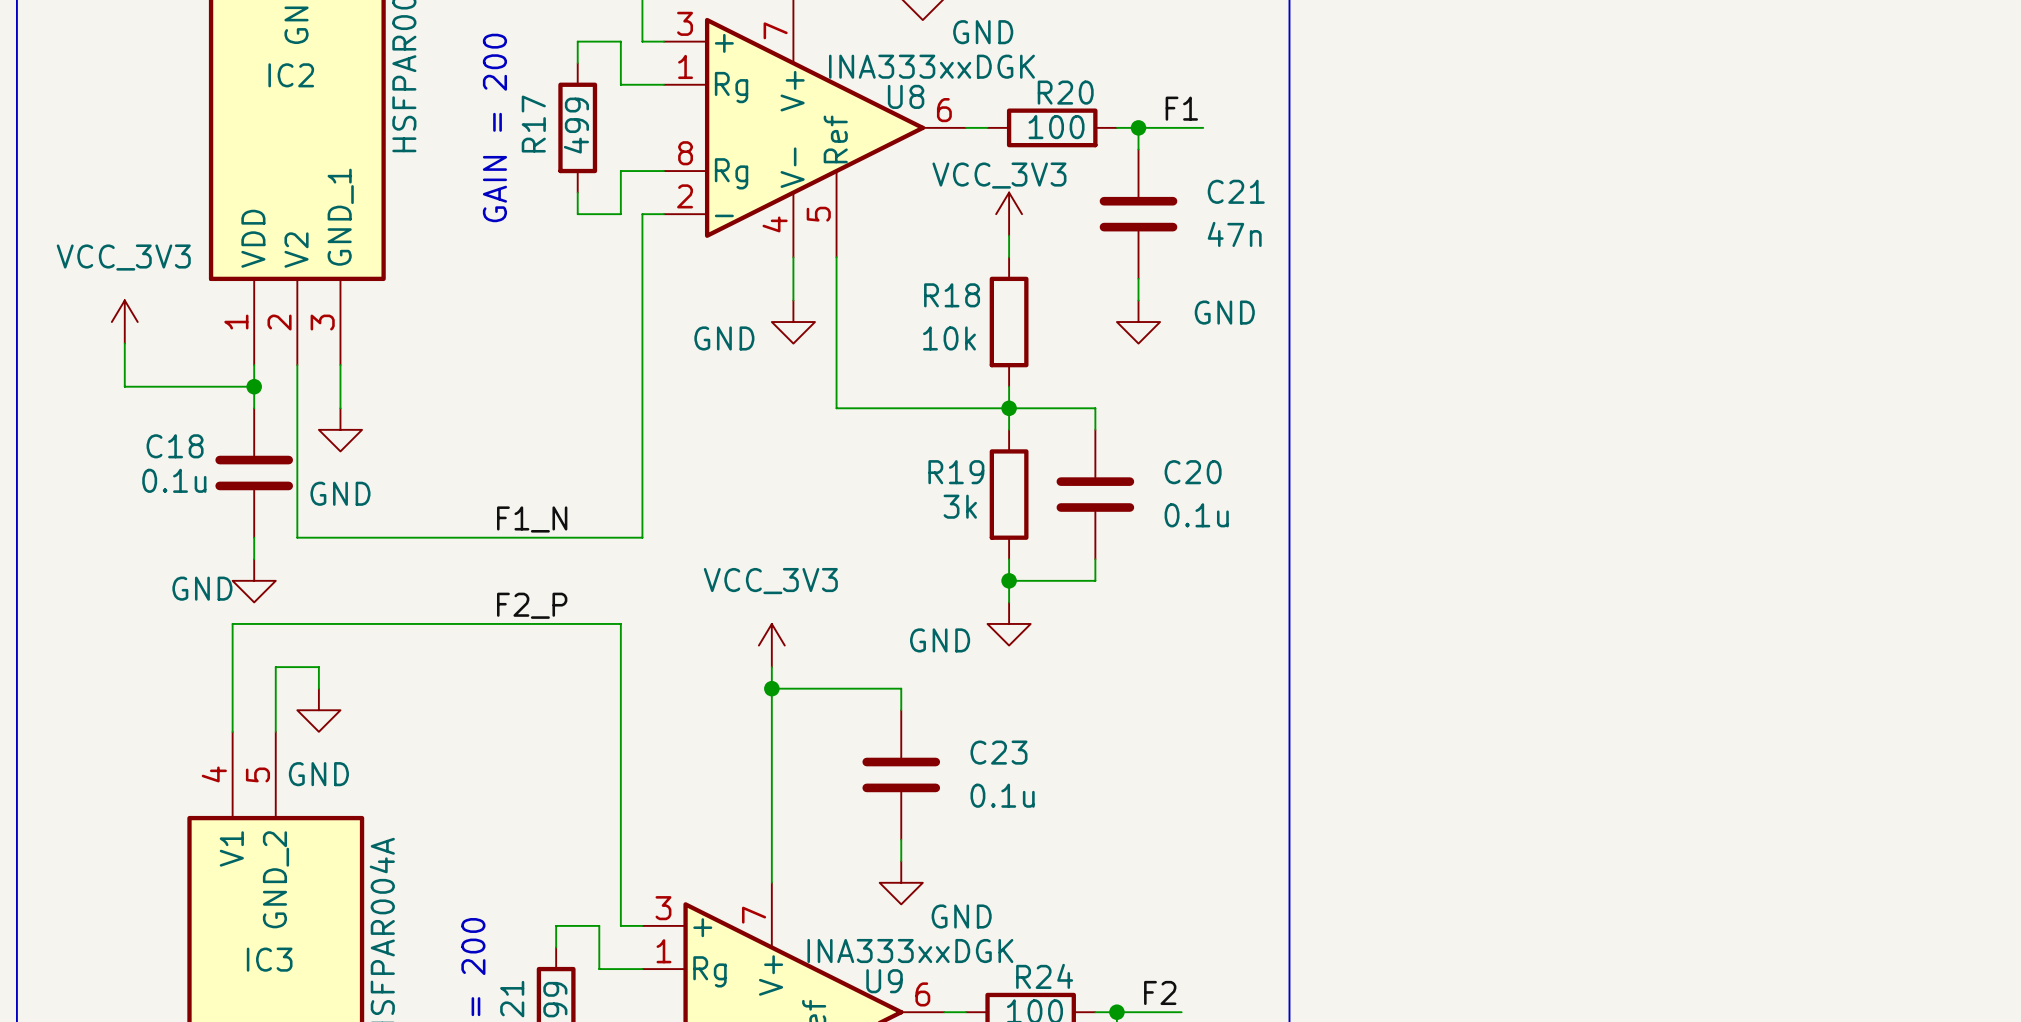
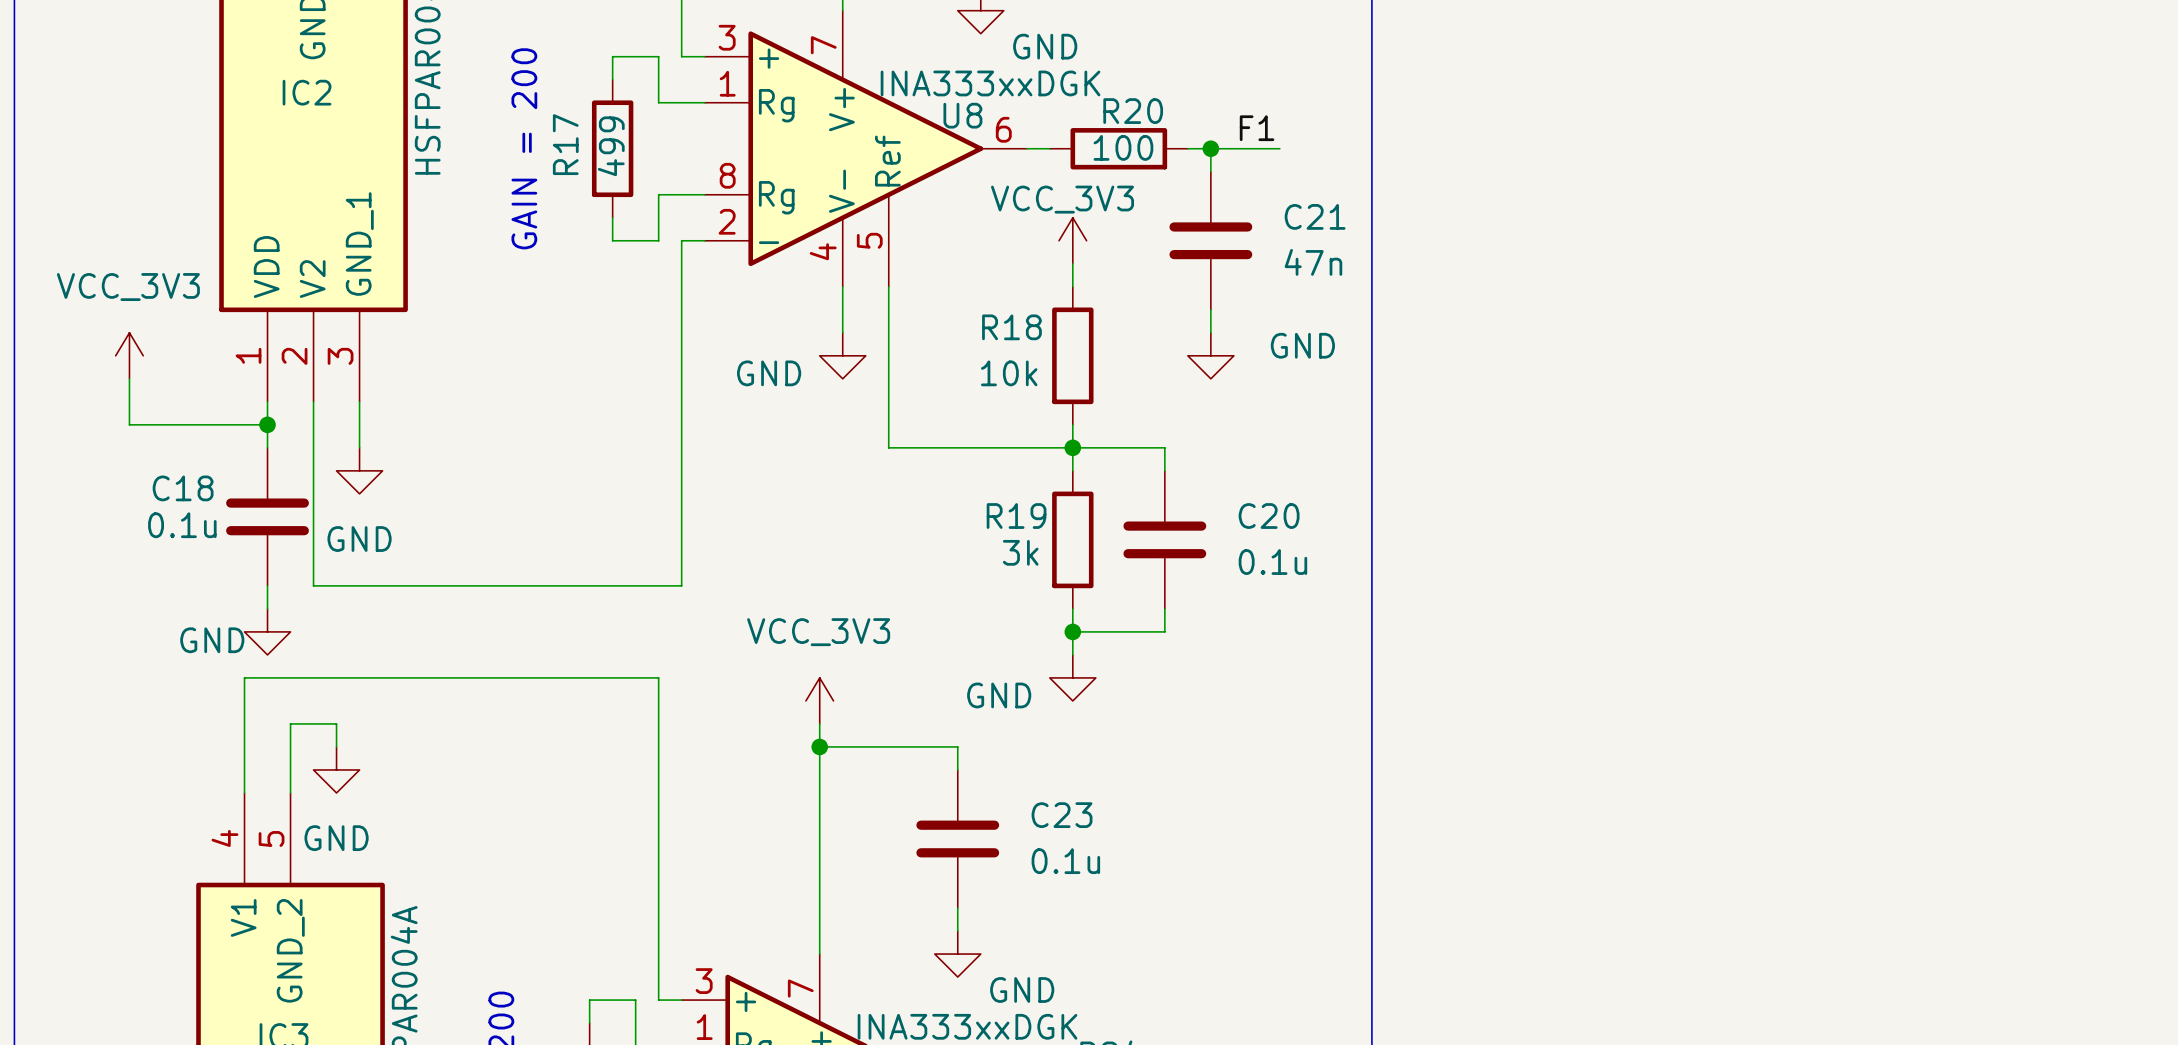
label: F1_N (532, 519) -> none
label: F2_P (532, 605) -> none

